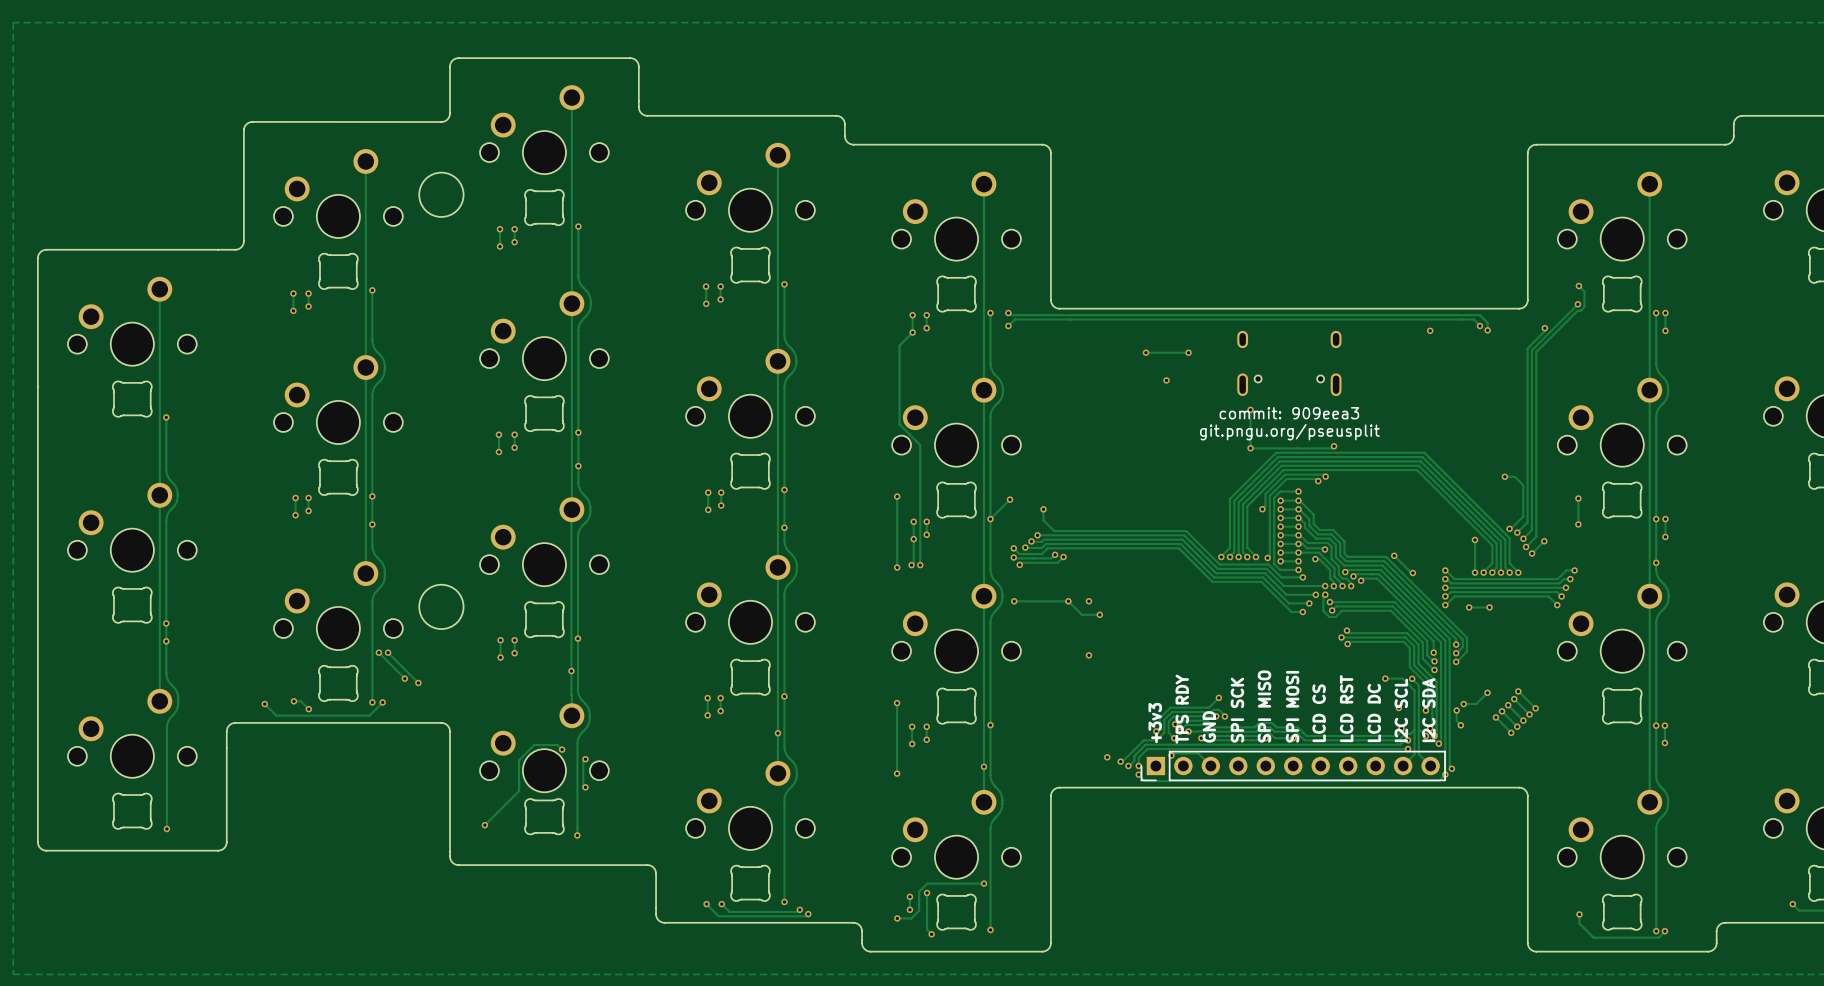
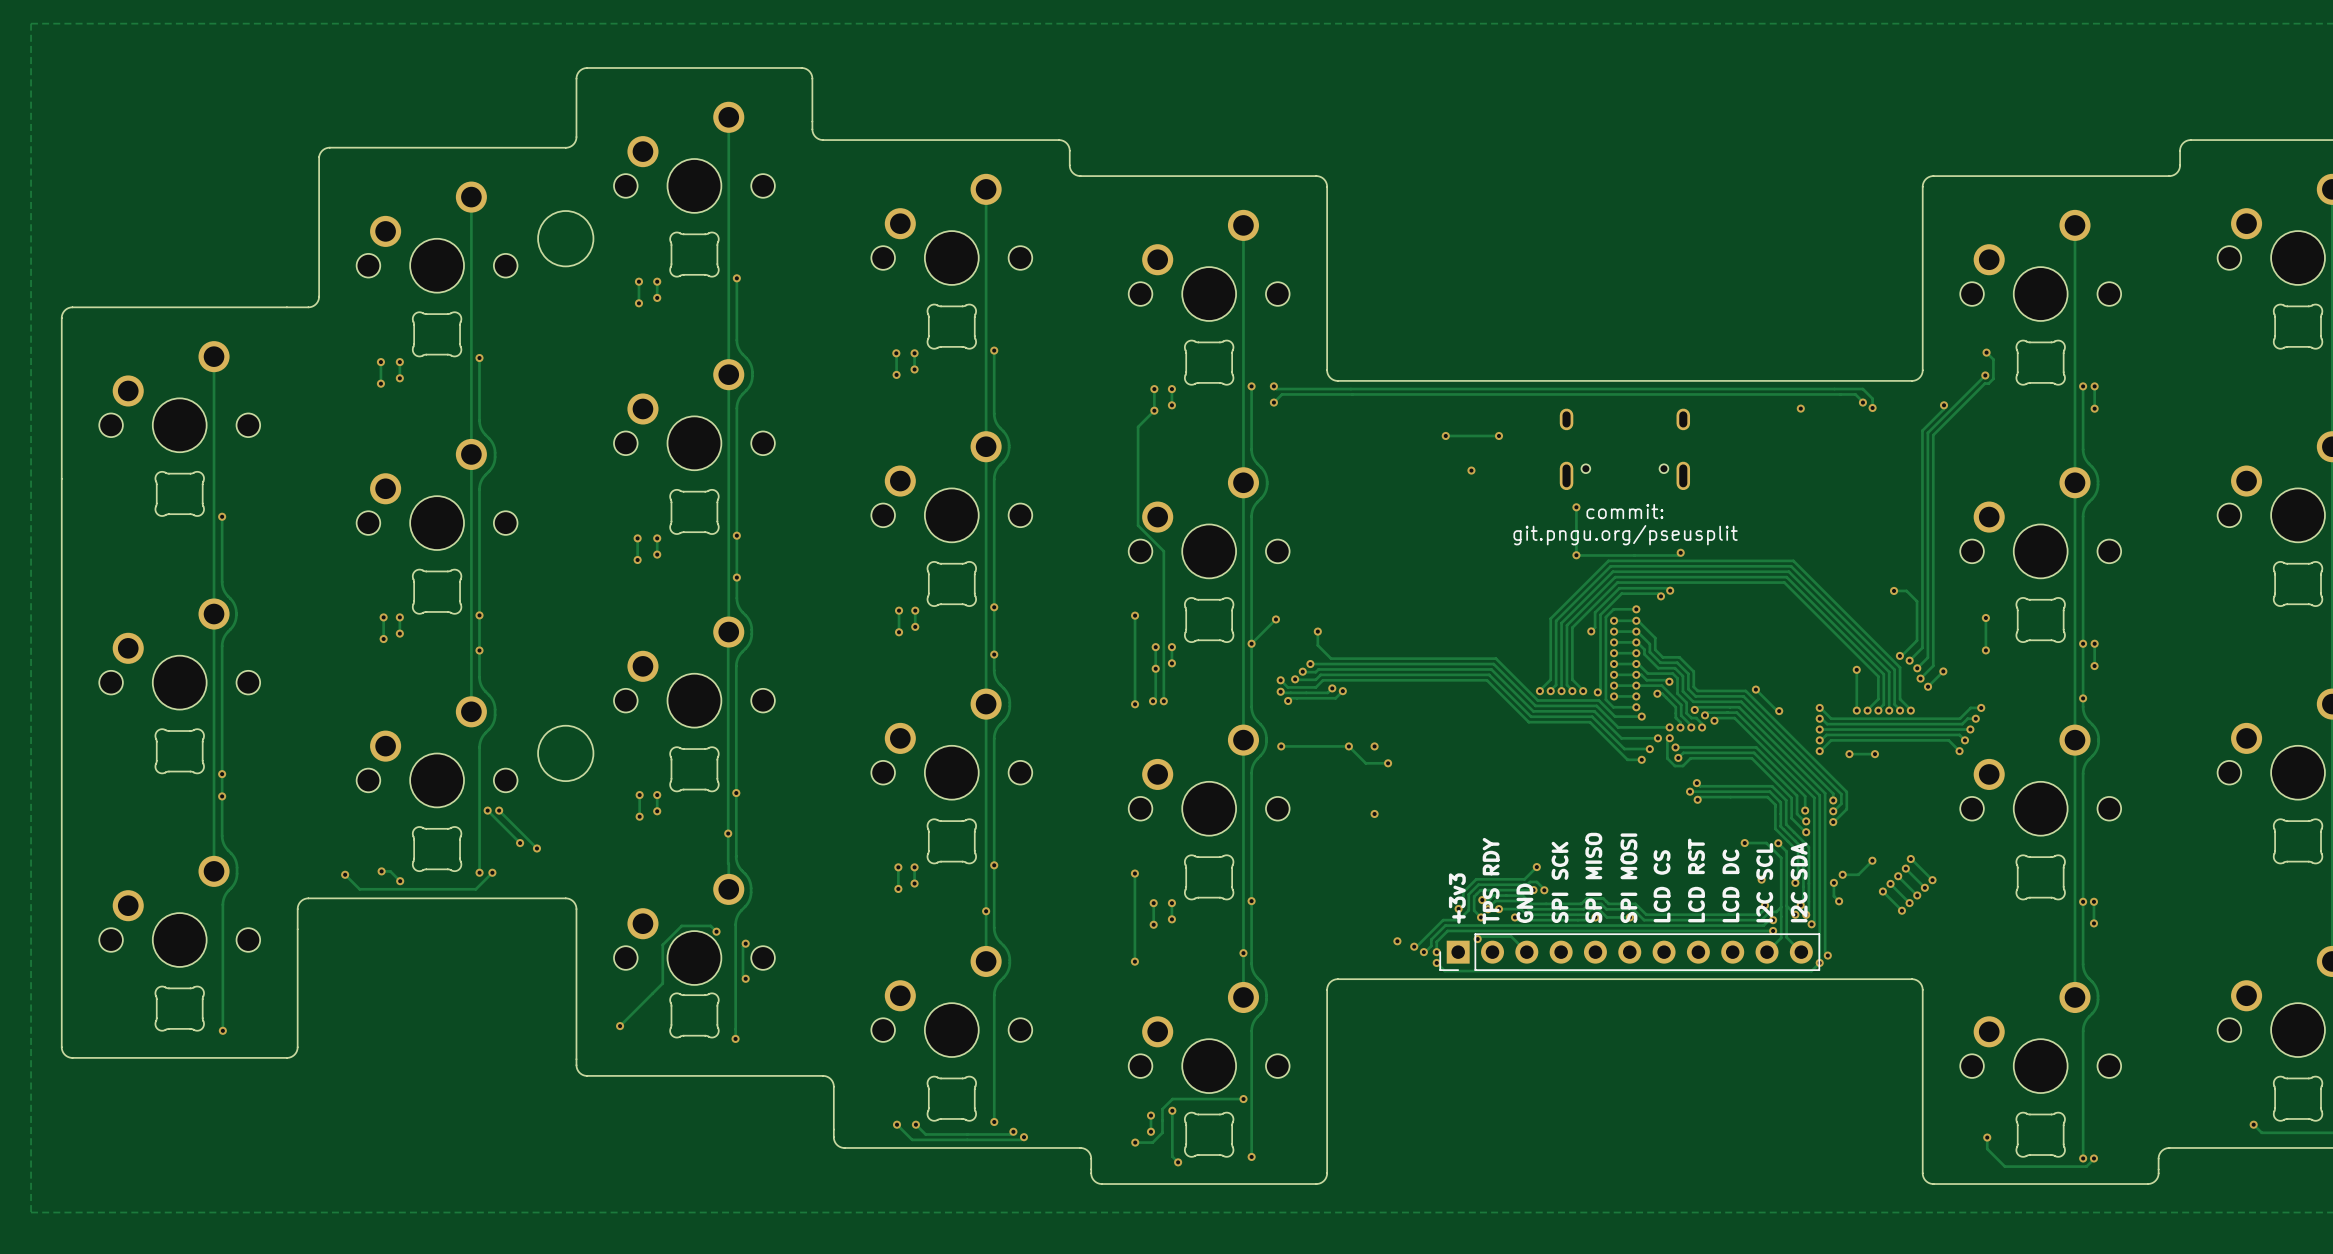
text: commit: 909eea3 (1289, 413) -> commit: (1624, 511)

